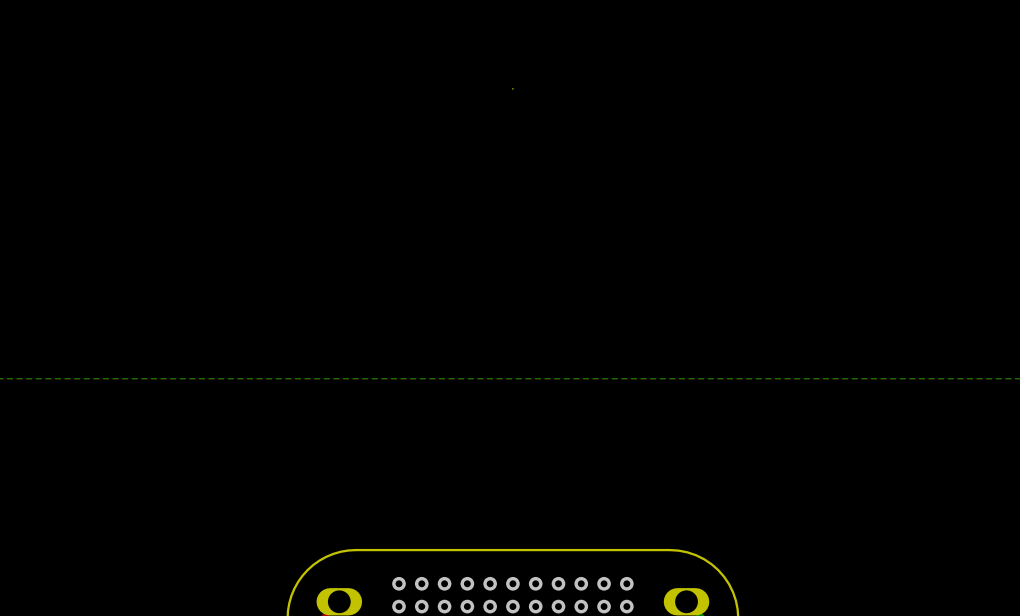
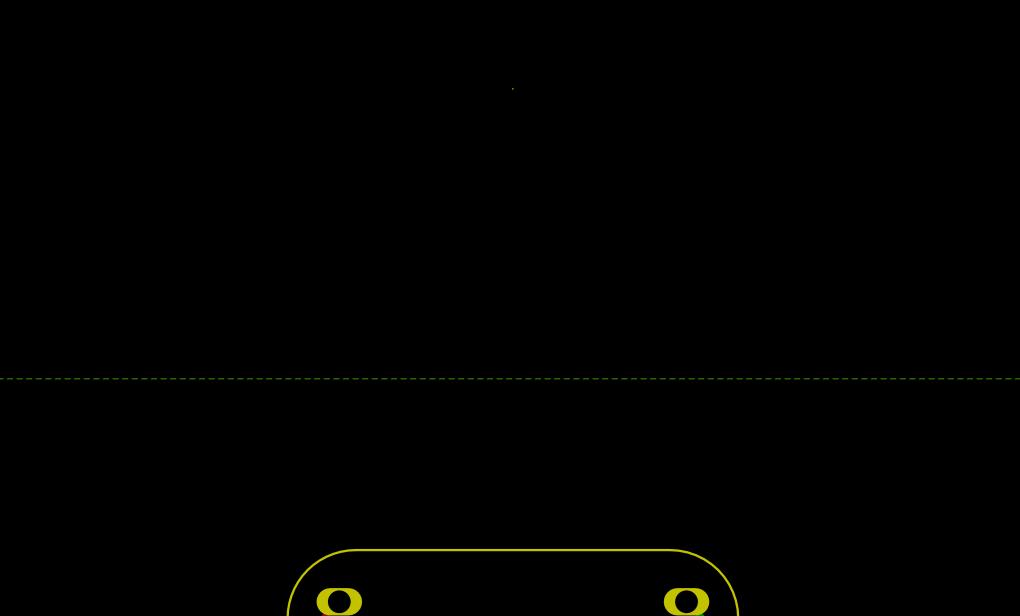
via: (399, 583) -> none
via: (421, 583) -> none
via: (444, 583) -> none
via: (467, 583) -> none
via: (490, 583) -> none
via: (512, 583) -> none
via: (535, 583) -> none
via: (558, 583) -> none
via: (581, 583) -> none
via: (604, 583) -> none
via: (626, 583) -> none
via: (399, 606) -> none
via: (421, 606) -> none
via: (444, 606) -> none
via: (467, 606) -> none
via: (490, 606) -> none
via: (512, 606) -> none
via: (535, 606) -> none
via: (558, 606) -> none
via: (581, 606) -> none
via: (604, 606) -> none
via: (626, 606) -> none

